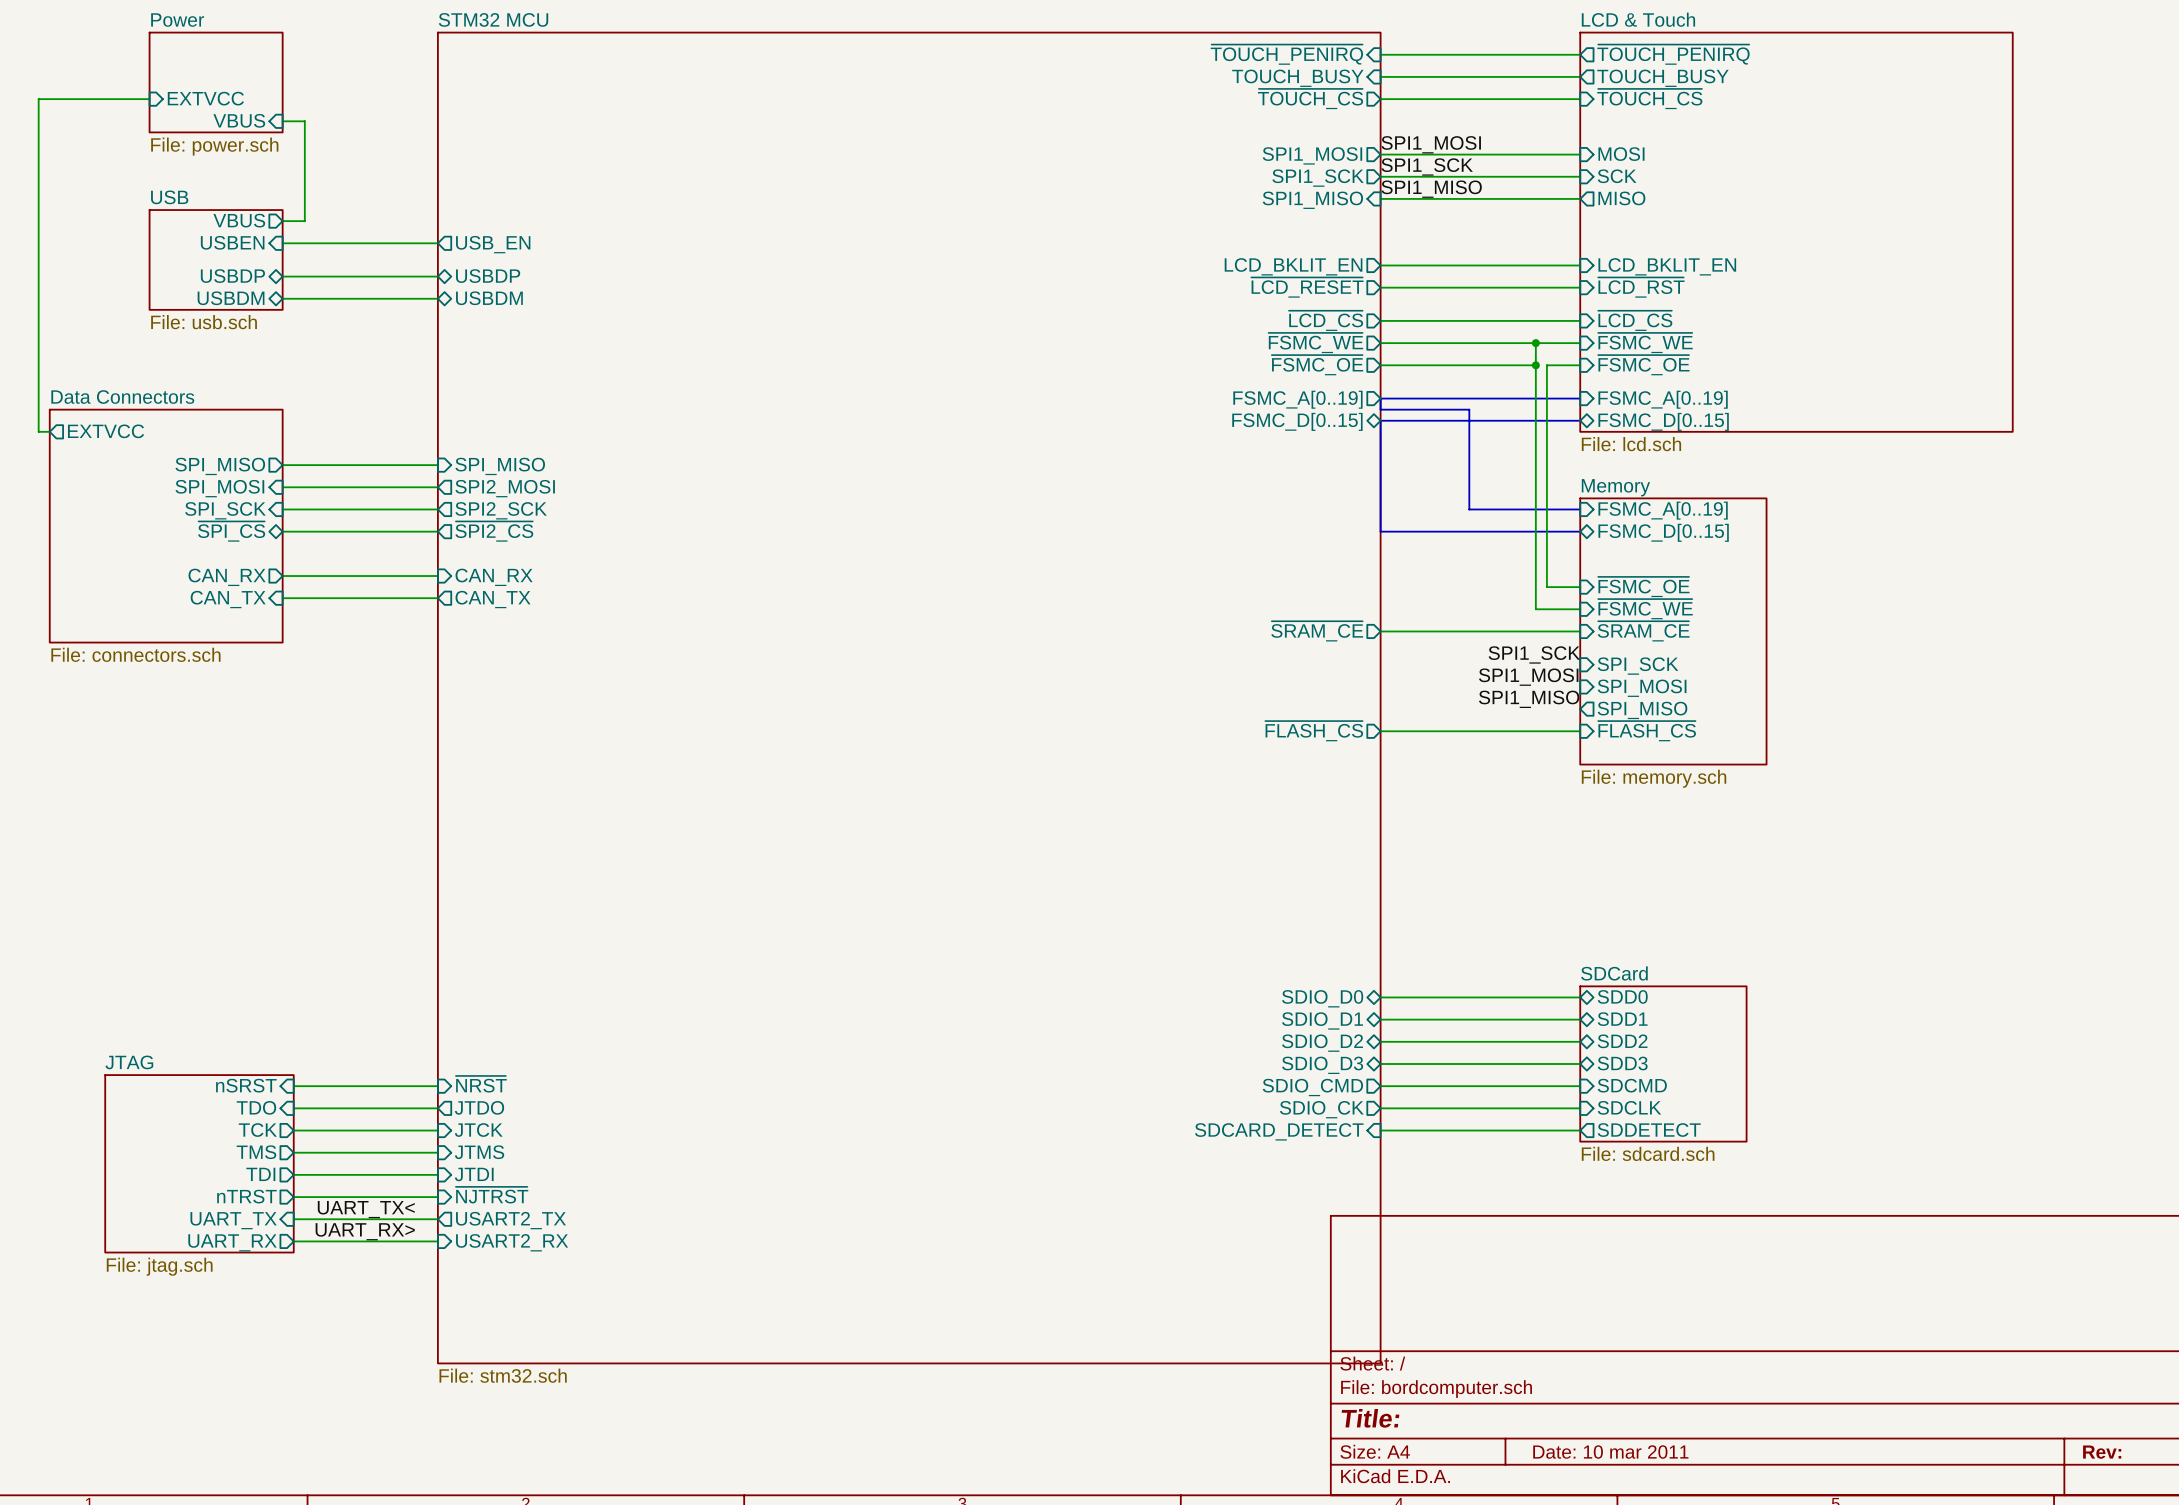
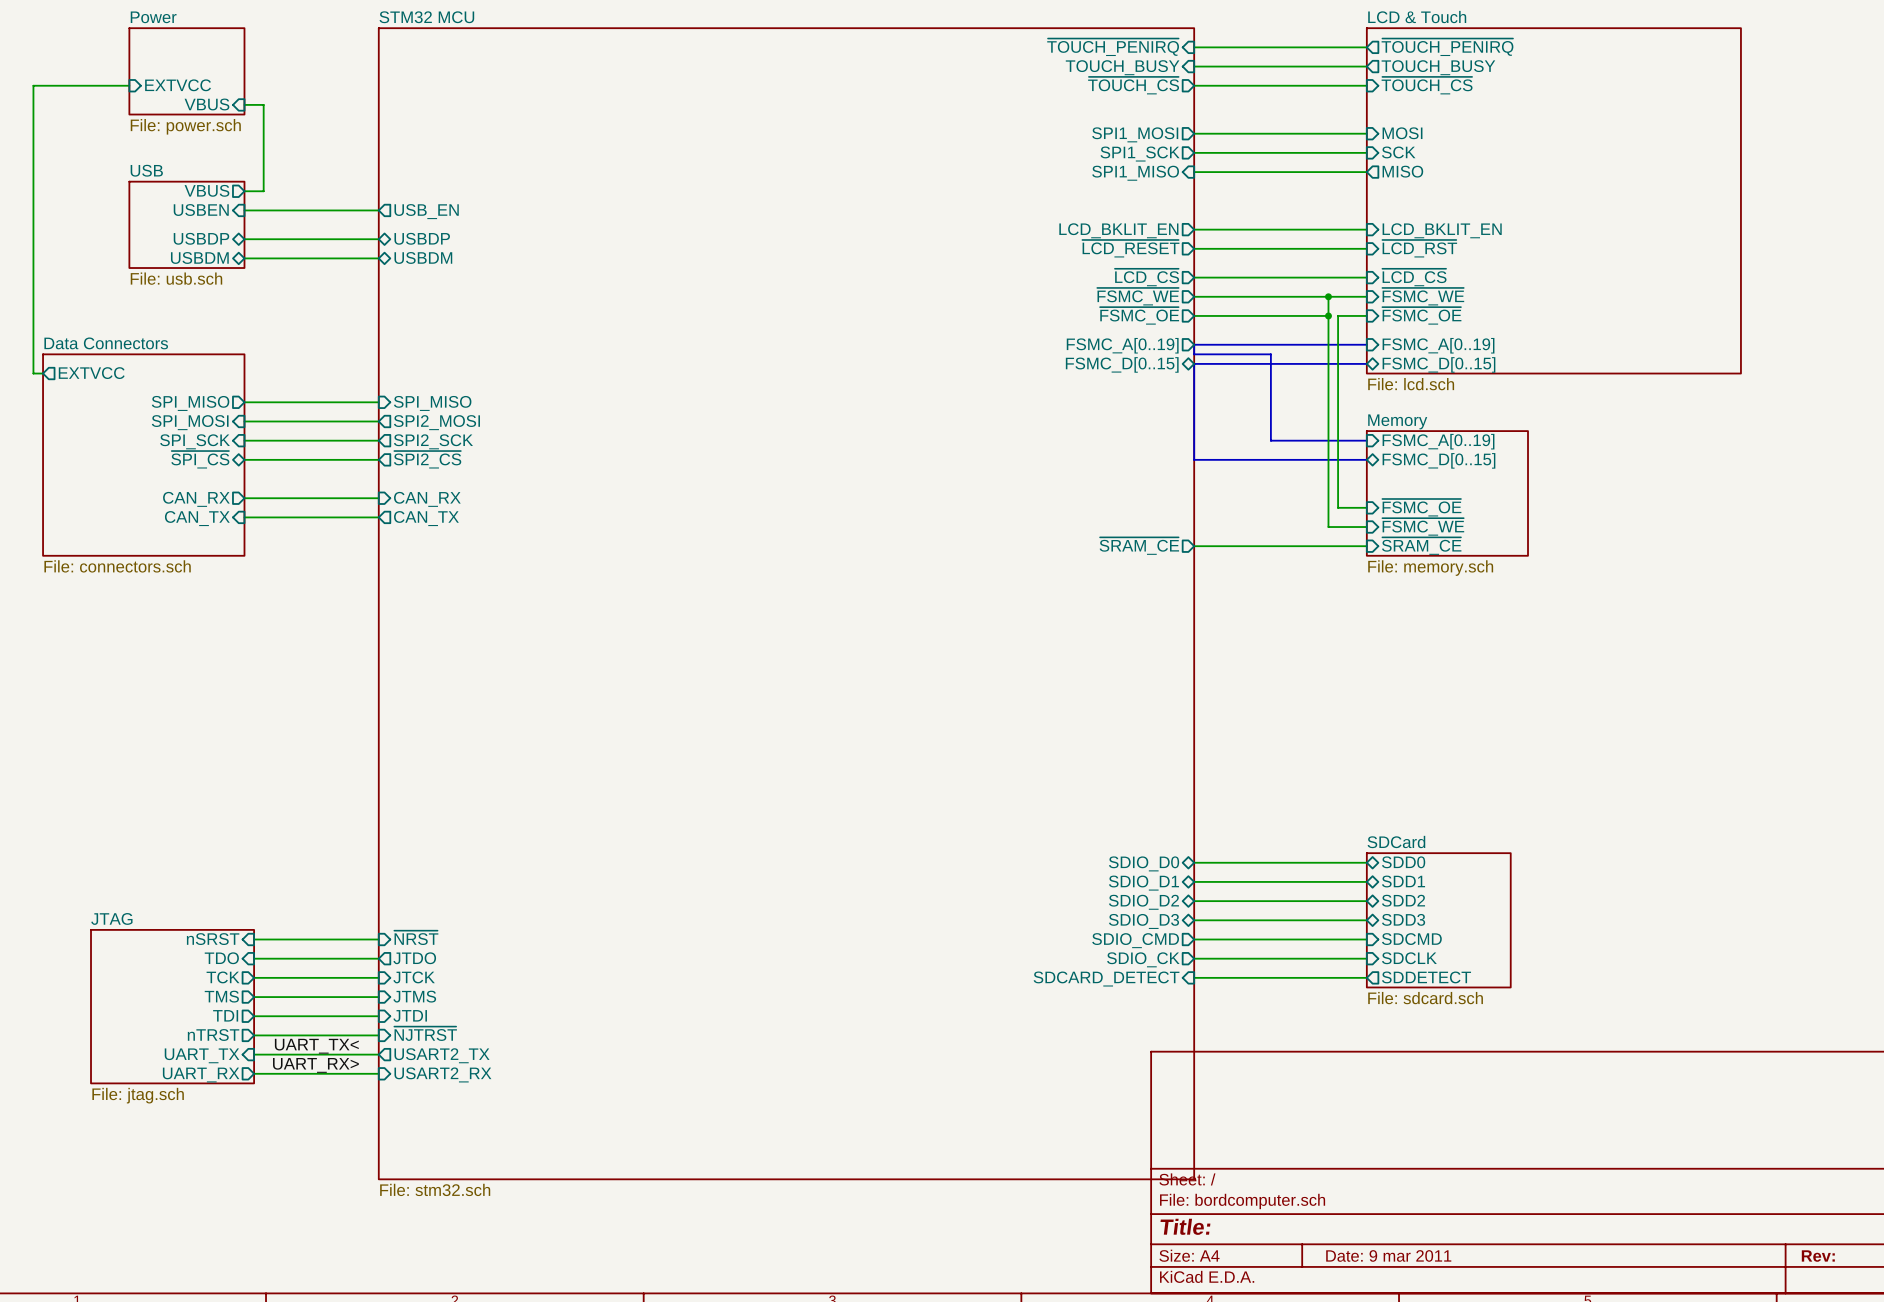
label: SPI1_MOSI (1431, 144) -> none
label: SPI1_SCK (1427, 166) -> none
label: SPI1_MISO (1431, 189) -> none
sheet Memory: none -> File: memory.sch (1447, 493)
sheet Memory: File: memory.sch (1673, 631) -> none
label: SPI1_SCK (1534, 654) -> none
sheet pin: SPI_SCK (1638, 666) -> none
label: SPI1_MOSI (1528, 677) -> none
sheet pin: SPI_MOSI (1642, 688) -> none
label: SPI1_MISO (1529, 699) -> none
sheet pin: SPI_MISO (1642, 710) -> none
sheet pin: ~{FLASH_CS} (1314, 731) -> none
wire: (1380, 731) (1580, 731) -> none
sheet pin: ~{FLASH_CS} (1647, 731) -> none
title block: Date: 10 mar 2011 (1610, 1452) -> Date: 9 mar 2011 (1388, 1255)

